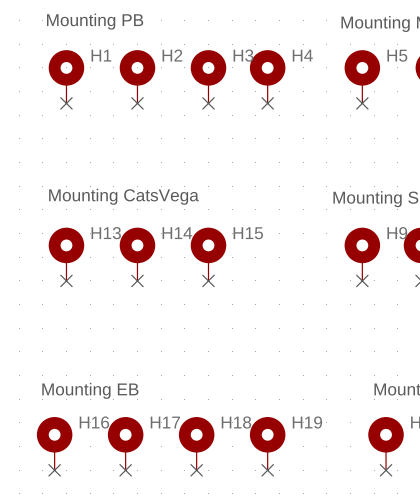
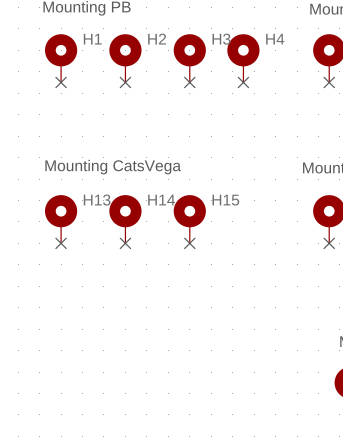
text: Mounting EB (90, 390) -> none
H16: (54, 443) -> none
H17: (125, 443) -> none
H18: (196, 443) -> none
H19: (267, 443) -> none
no-connect mark: (54, 470) -> none
no-connect mark: (125, 470) -> none
no-connect mark: (196, 470) -> none
no-connect mark: (267, 470) -> none

